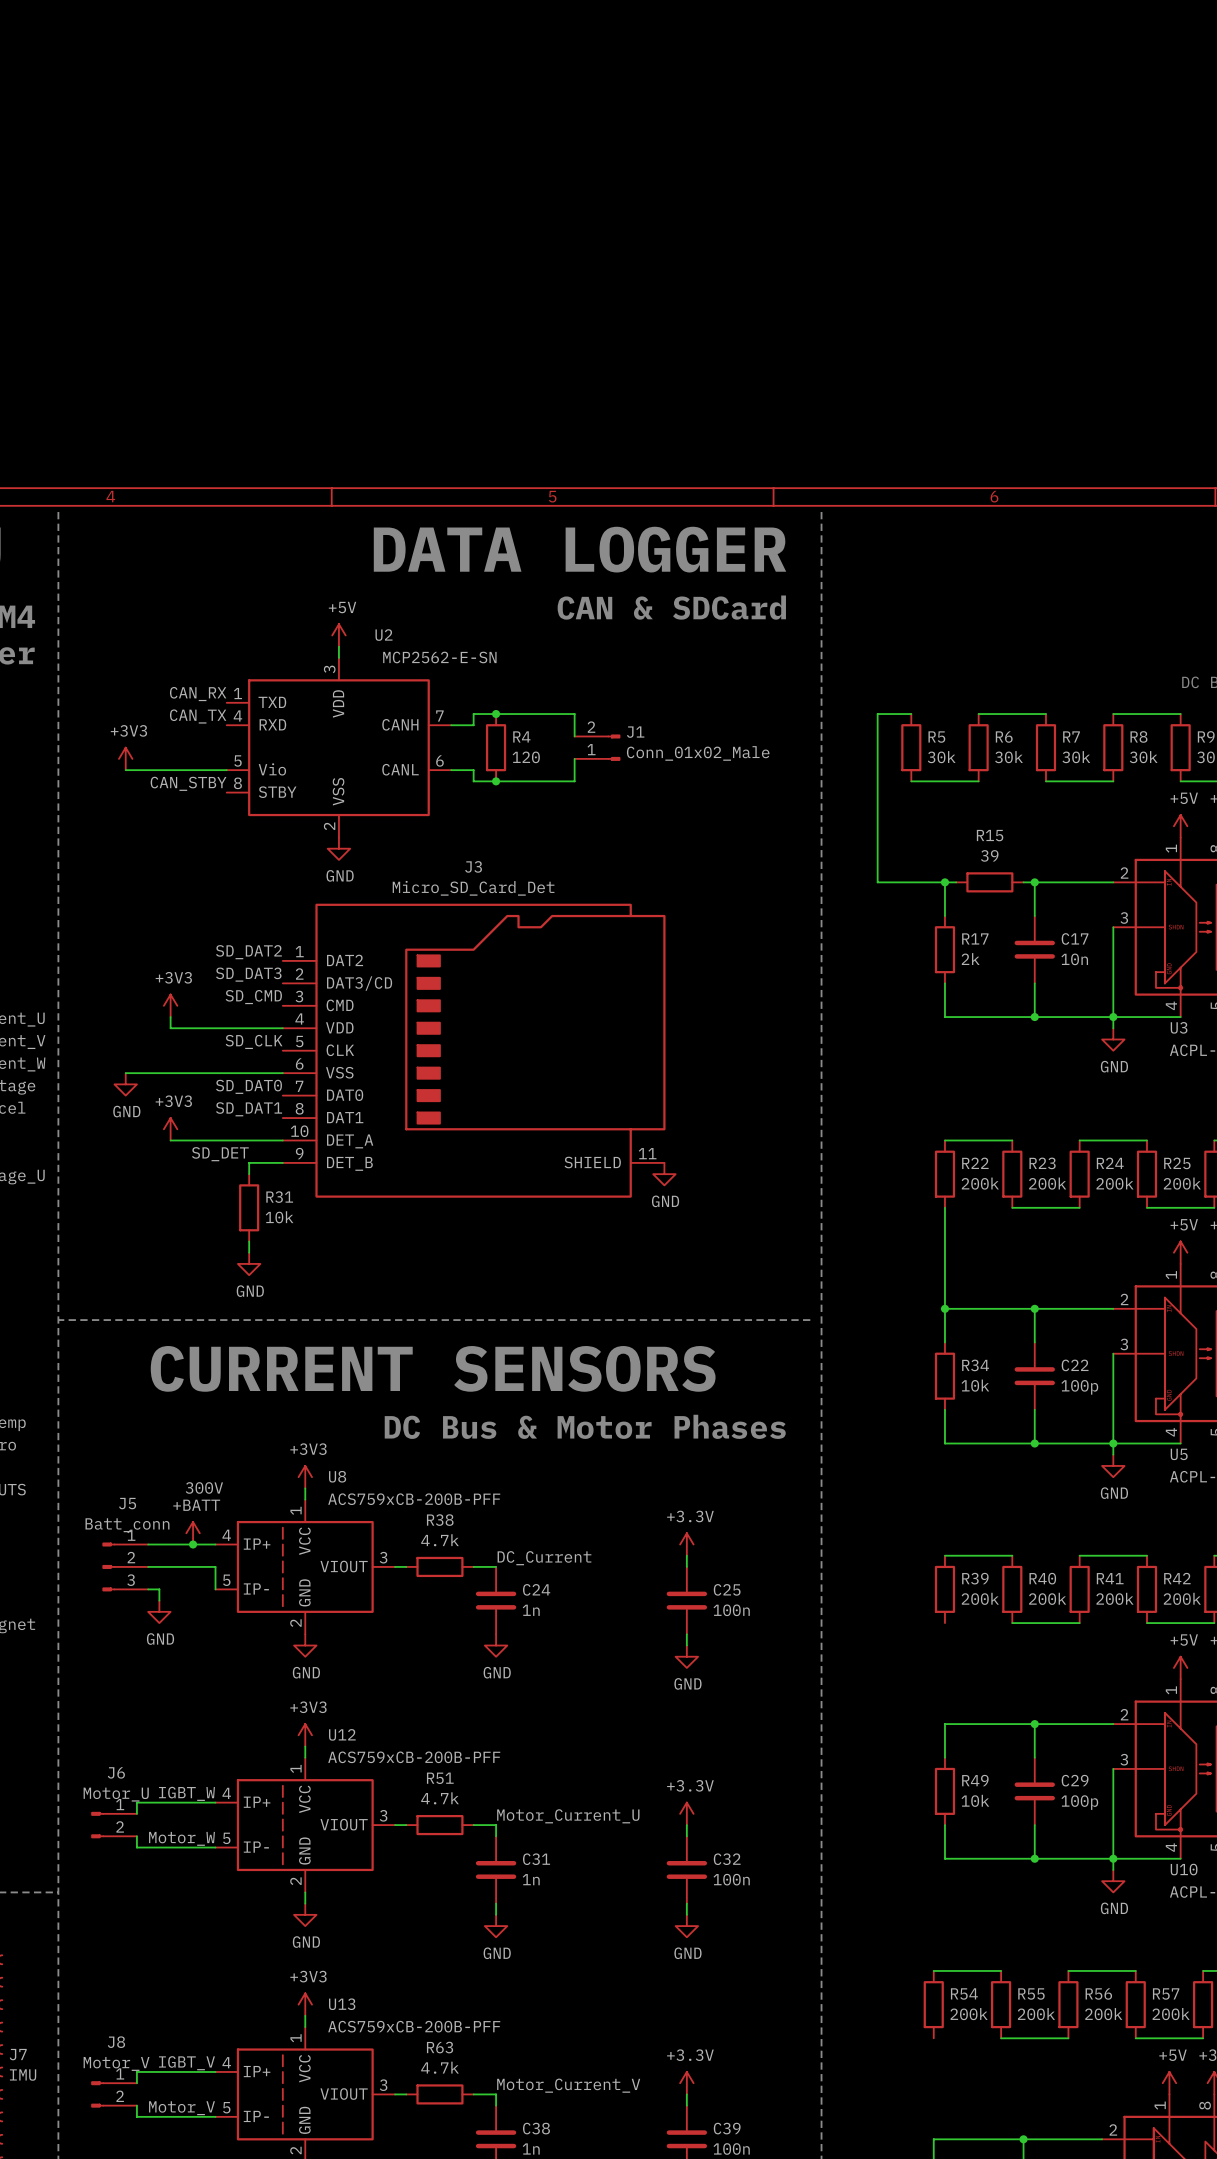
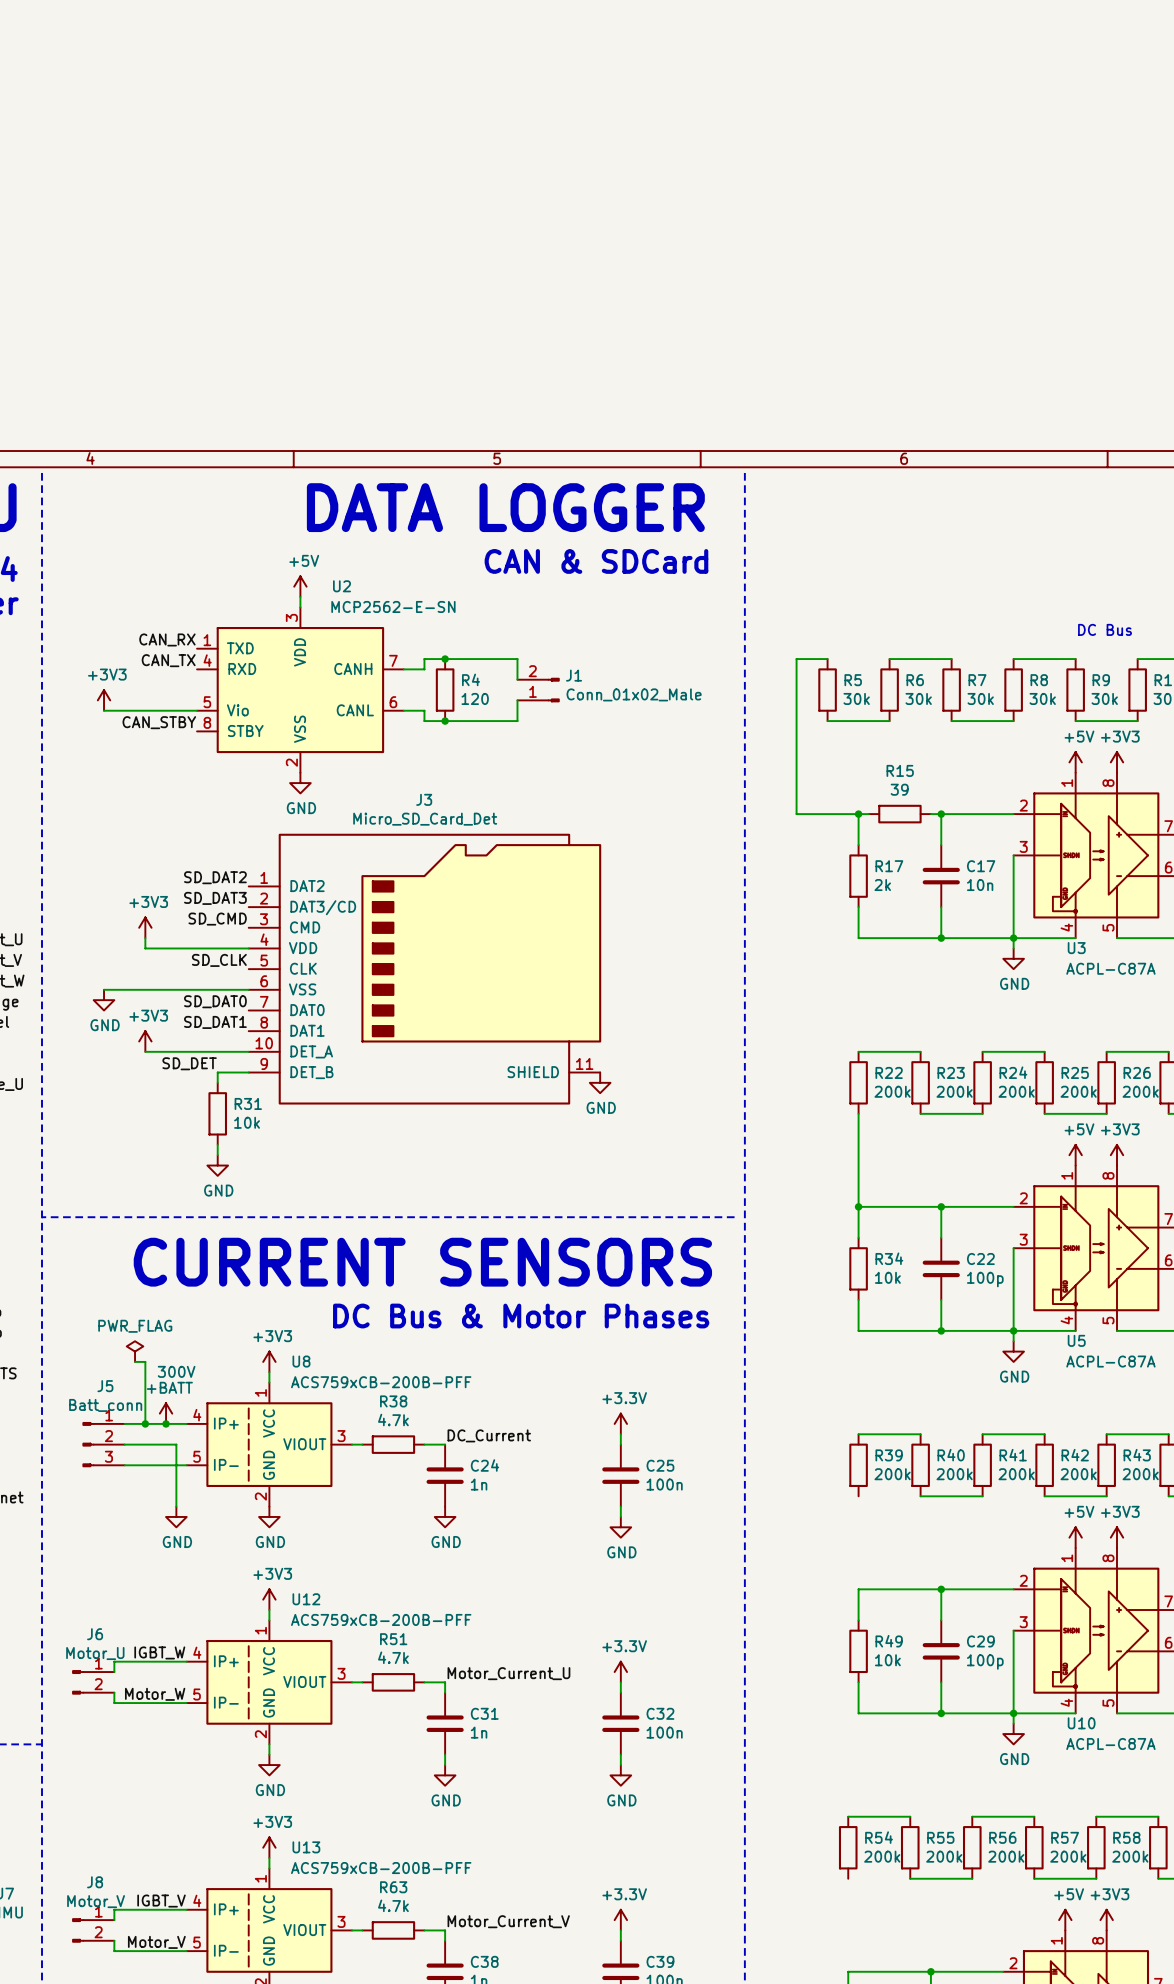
power symbol: none -> PWR_FLAG (135, 1351)
wire: none -> (135, 1361) (145, 1361) (145, 1423)
junction: none -> (145, 1423)
wire: (204, 1566) (215, 1566) (215, 1589) -> (176, 1444) (176, 1506)
wire: (159, 1589) (159, 1600) -> (135, 1465) (186, 1465)
power symbol position: GND (159, 1611) -> GND (176, 1516)

